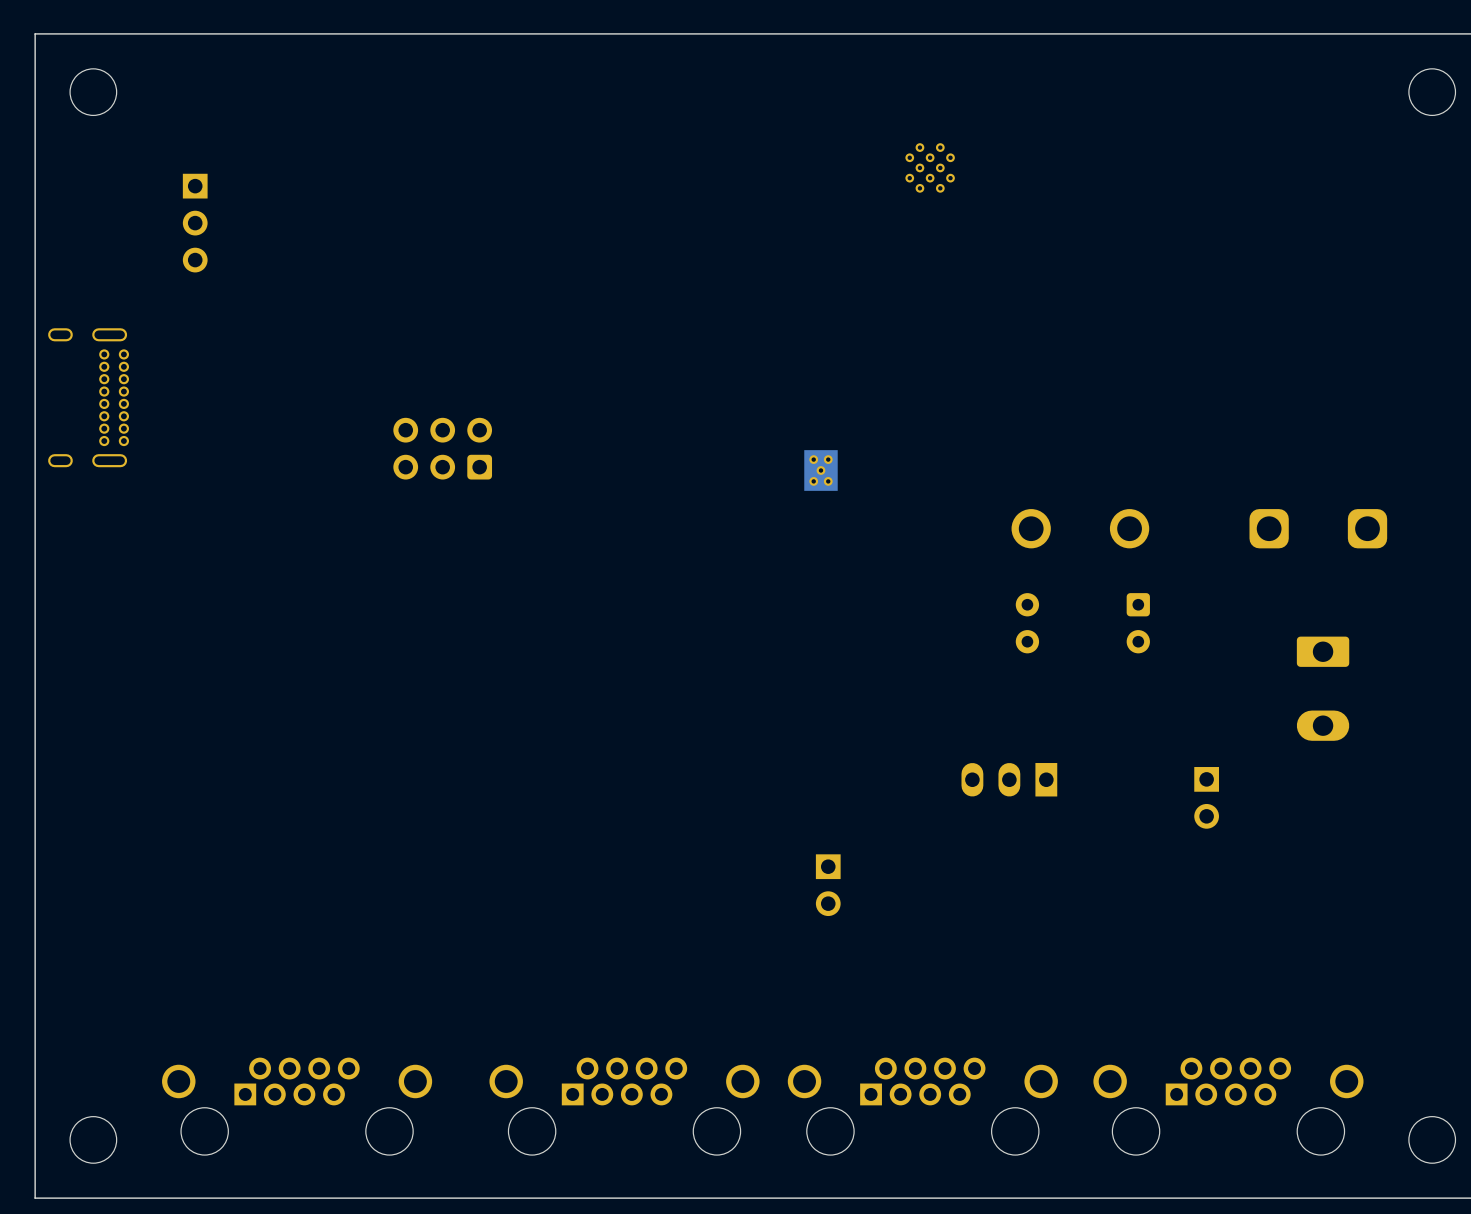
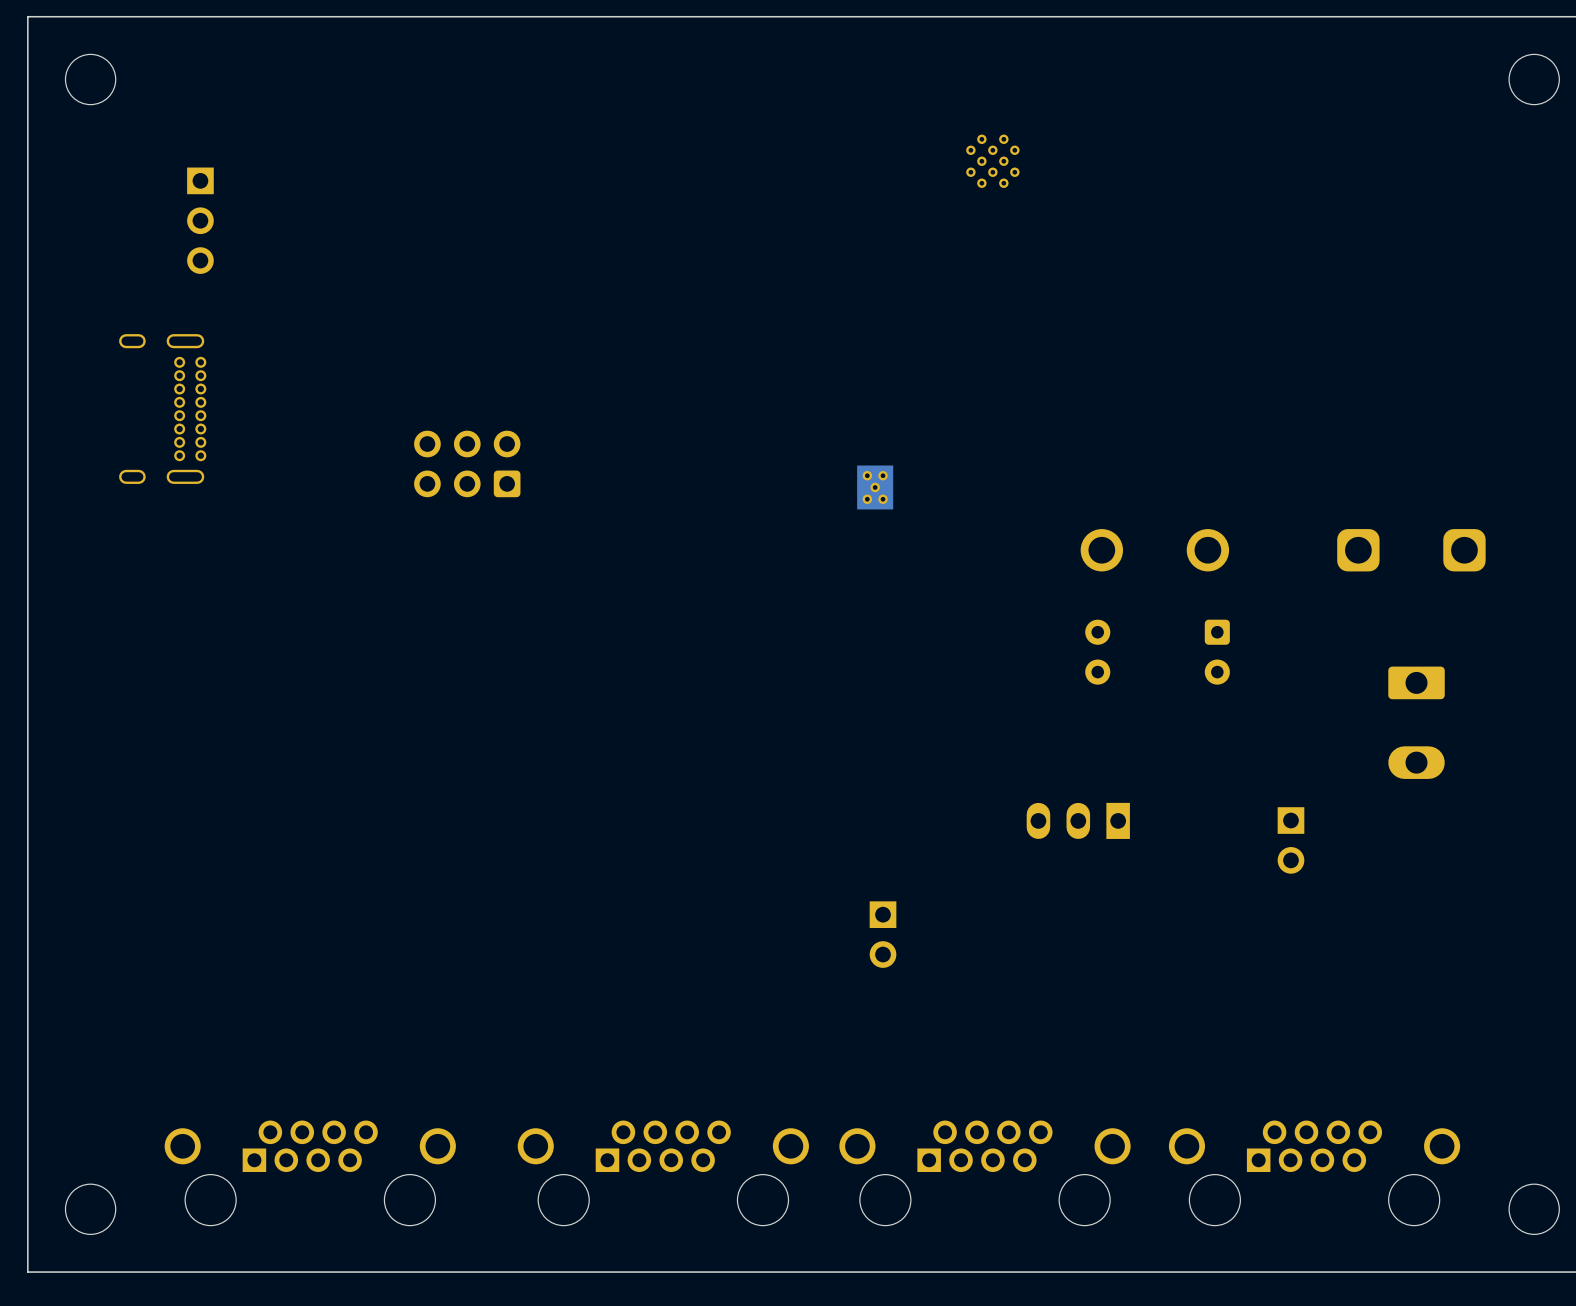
part position: (88, 397) -> (162, 409)

